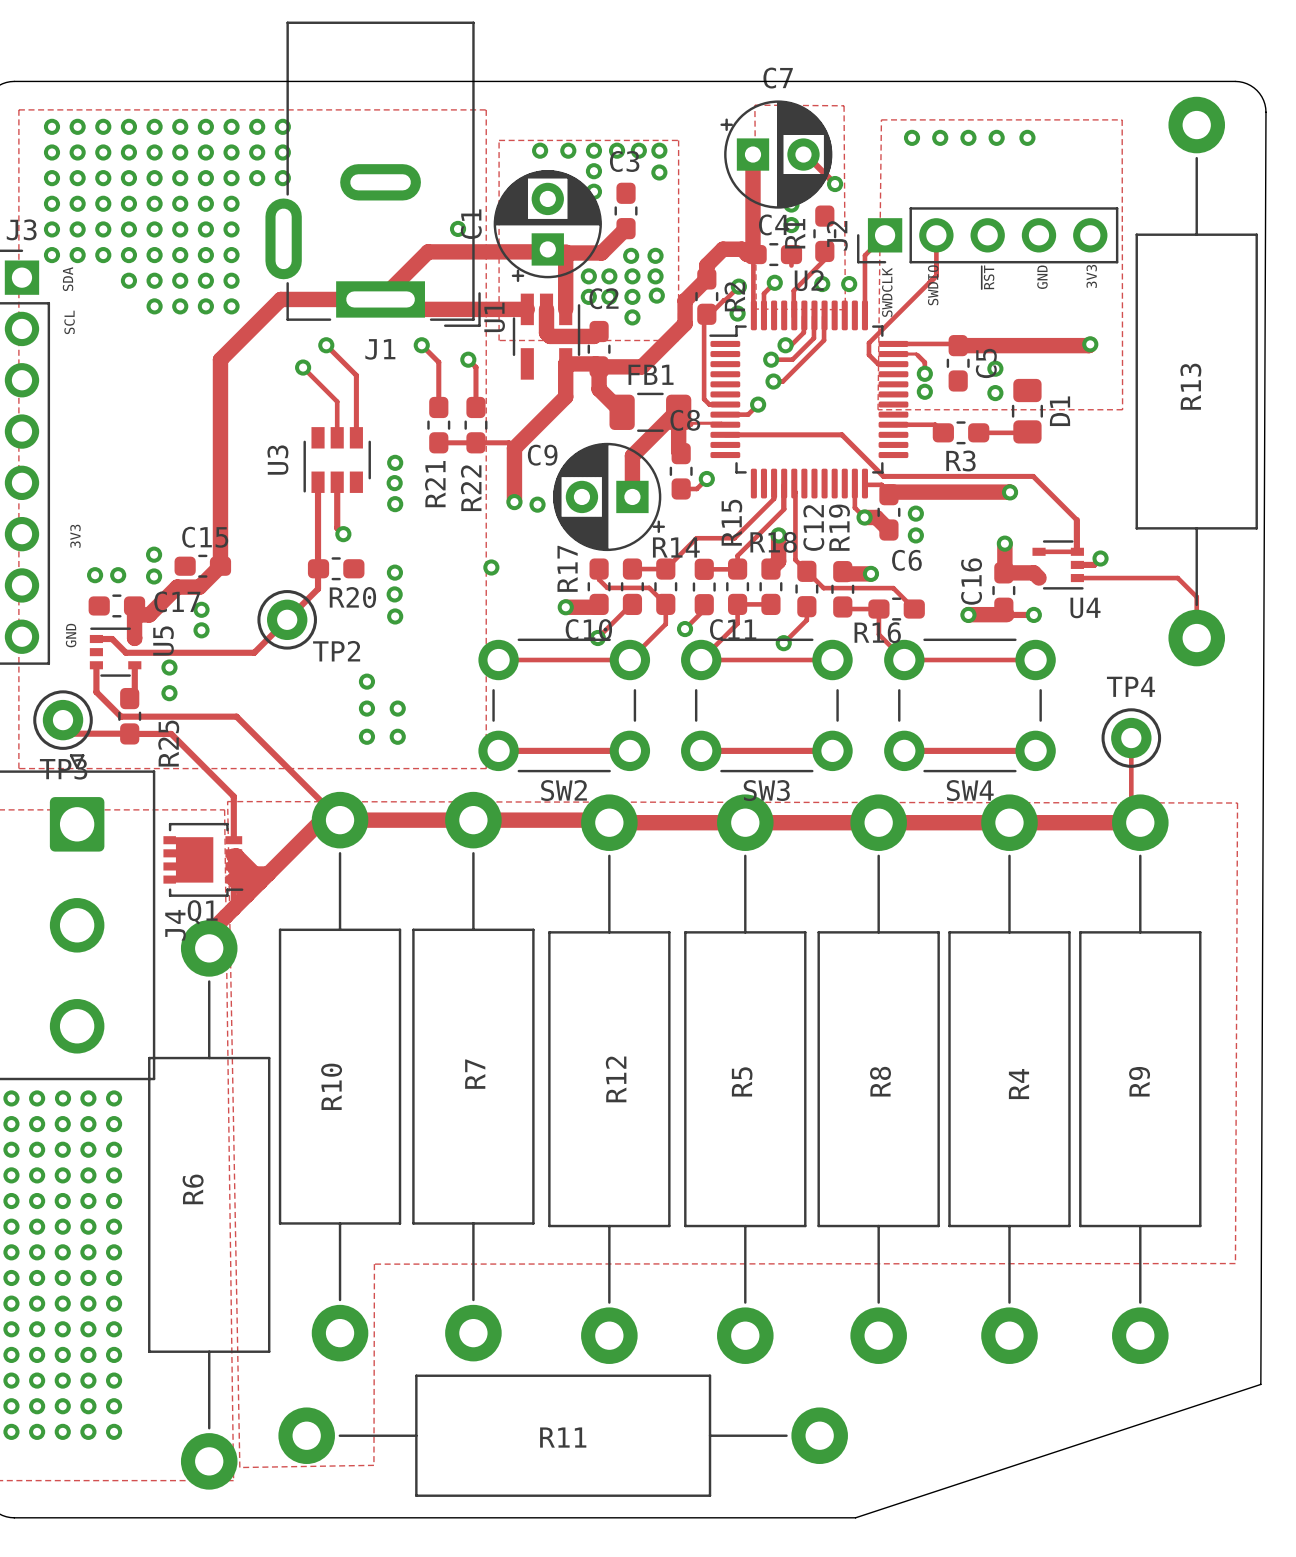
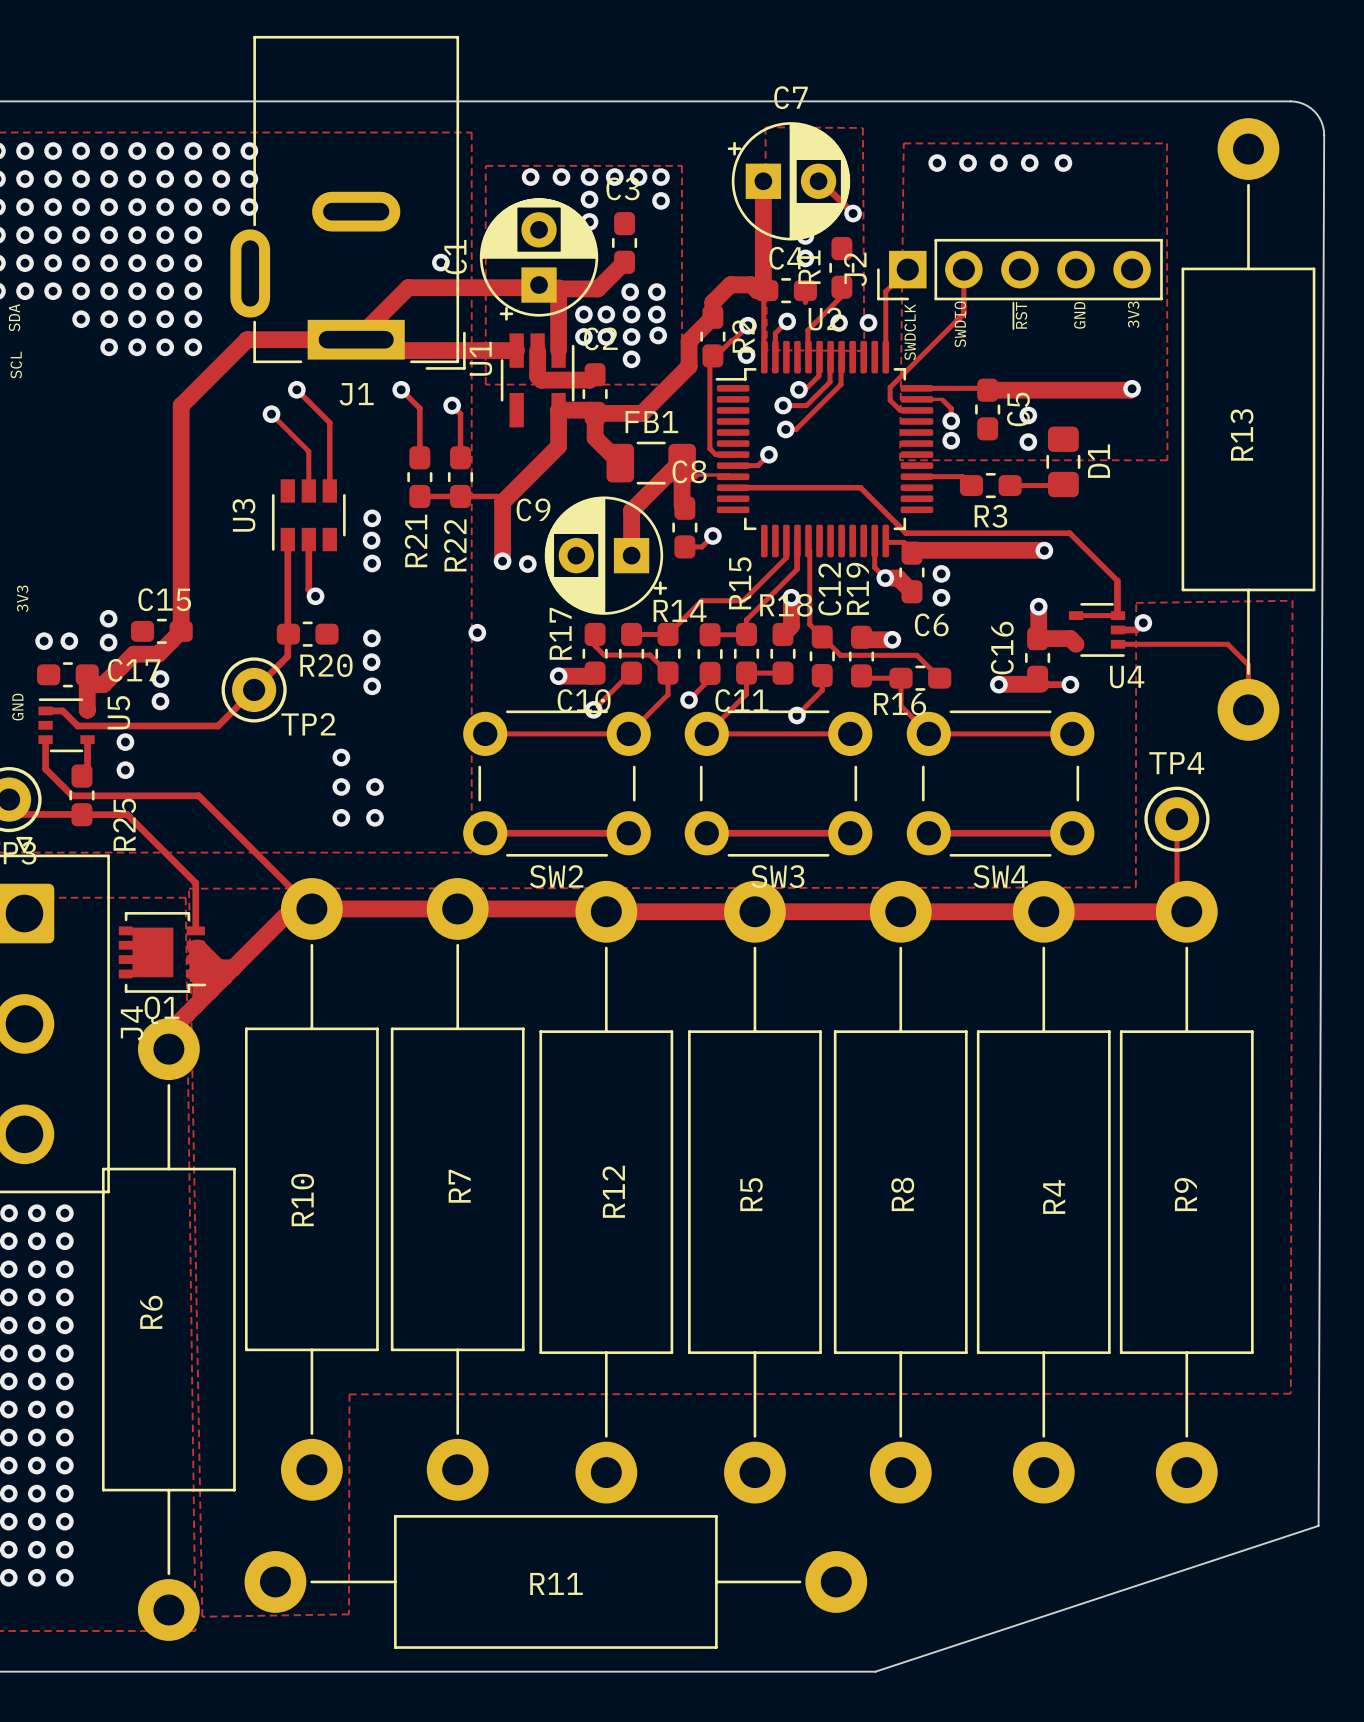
zone outline: (227, 801) (1237, 803) (1235, 1263) -> (189, 888) (1135, 887) (1136, 602) (1292, 600) (1290, 1393)

